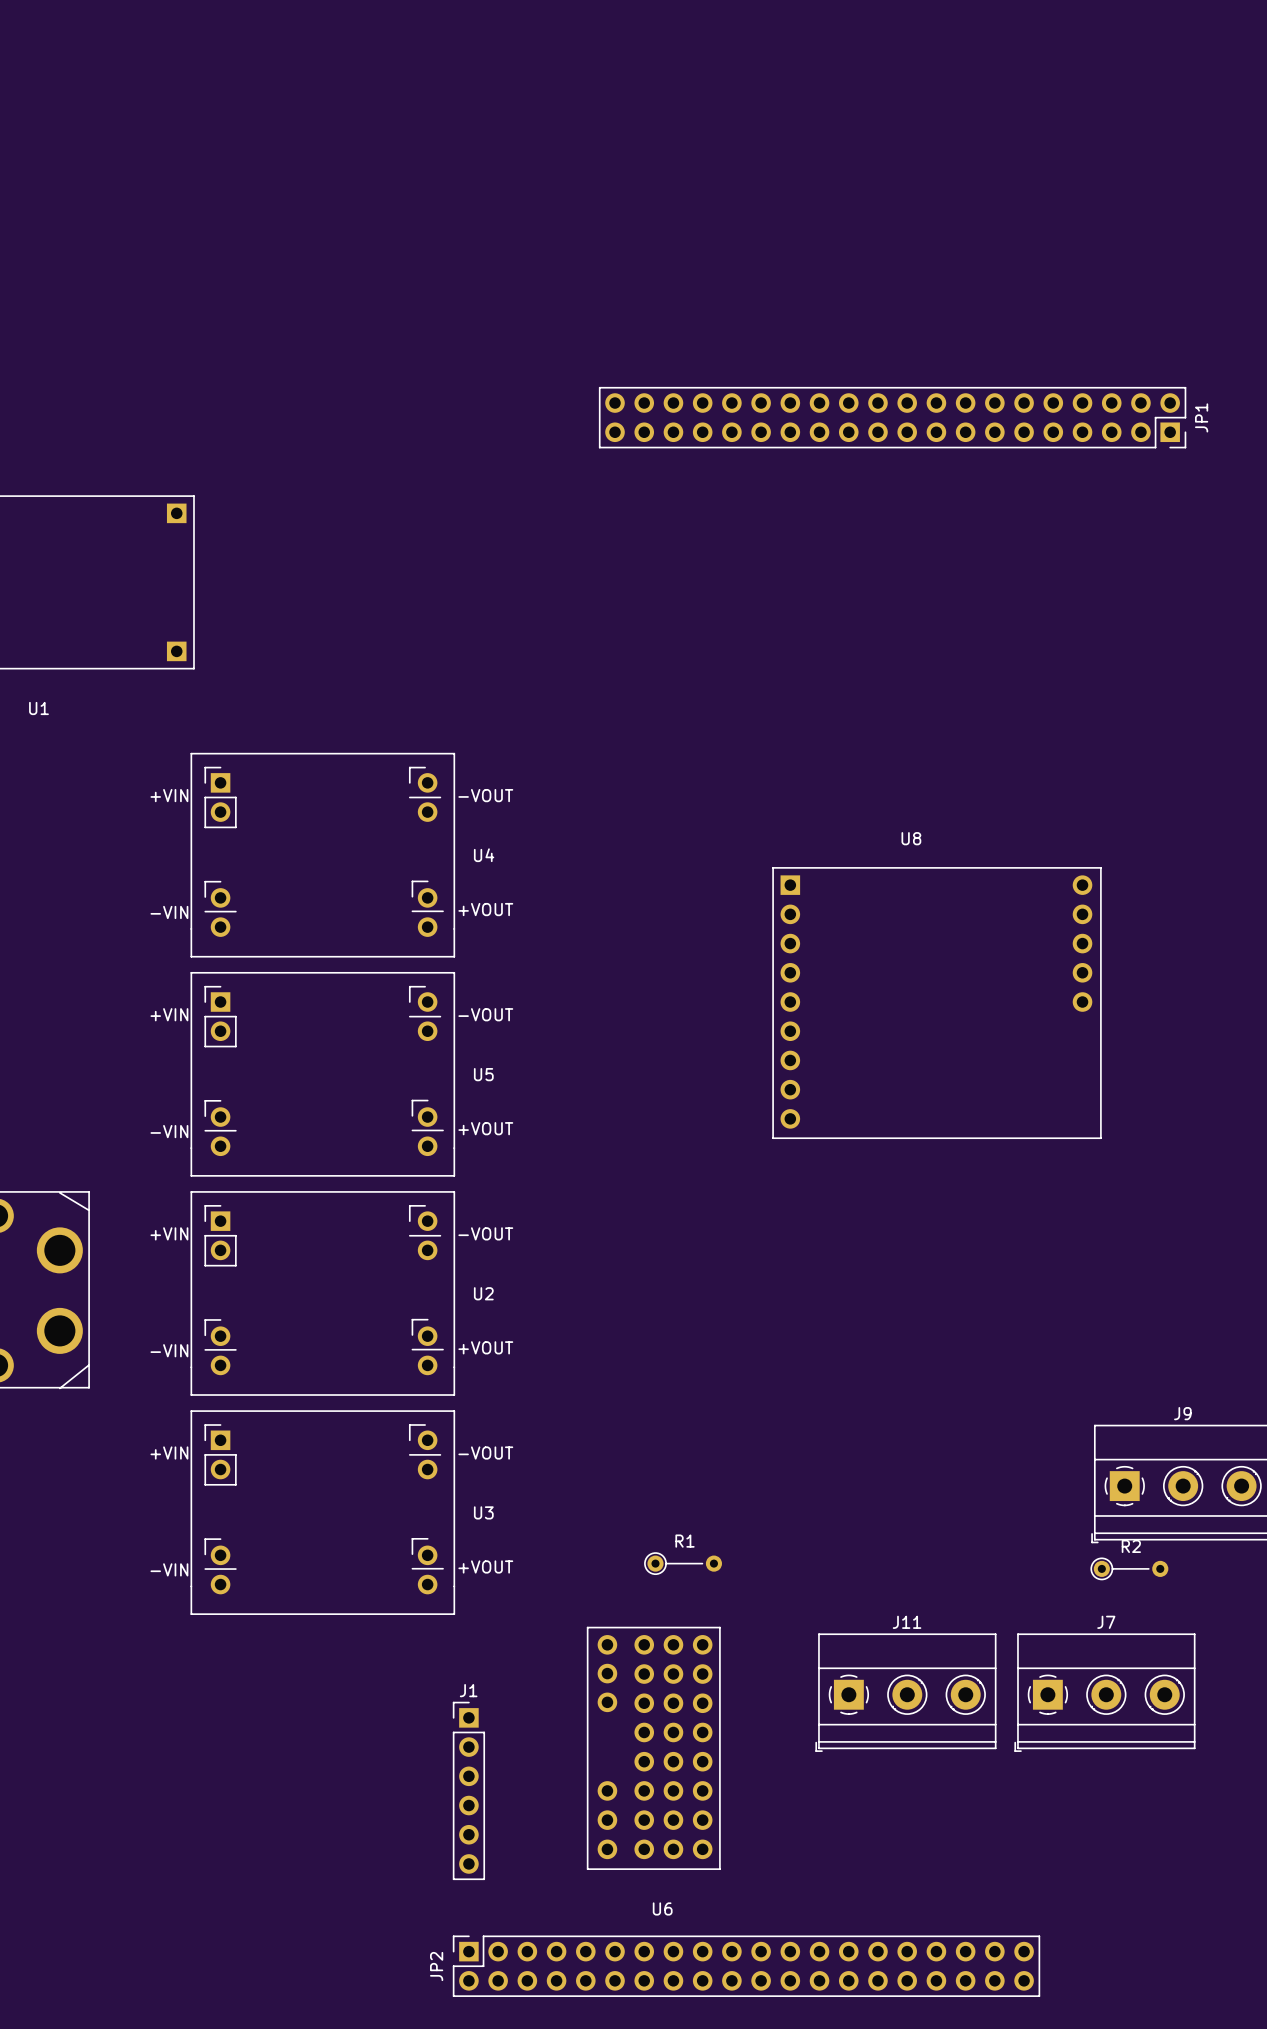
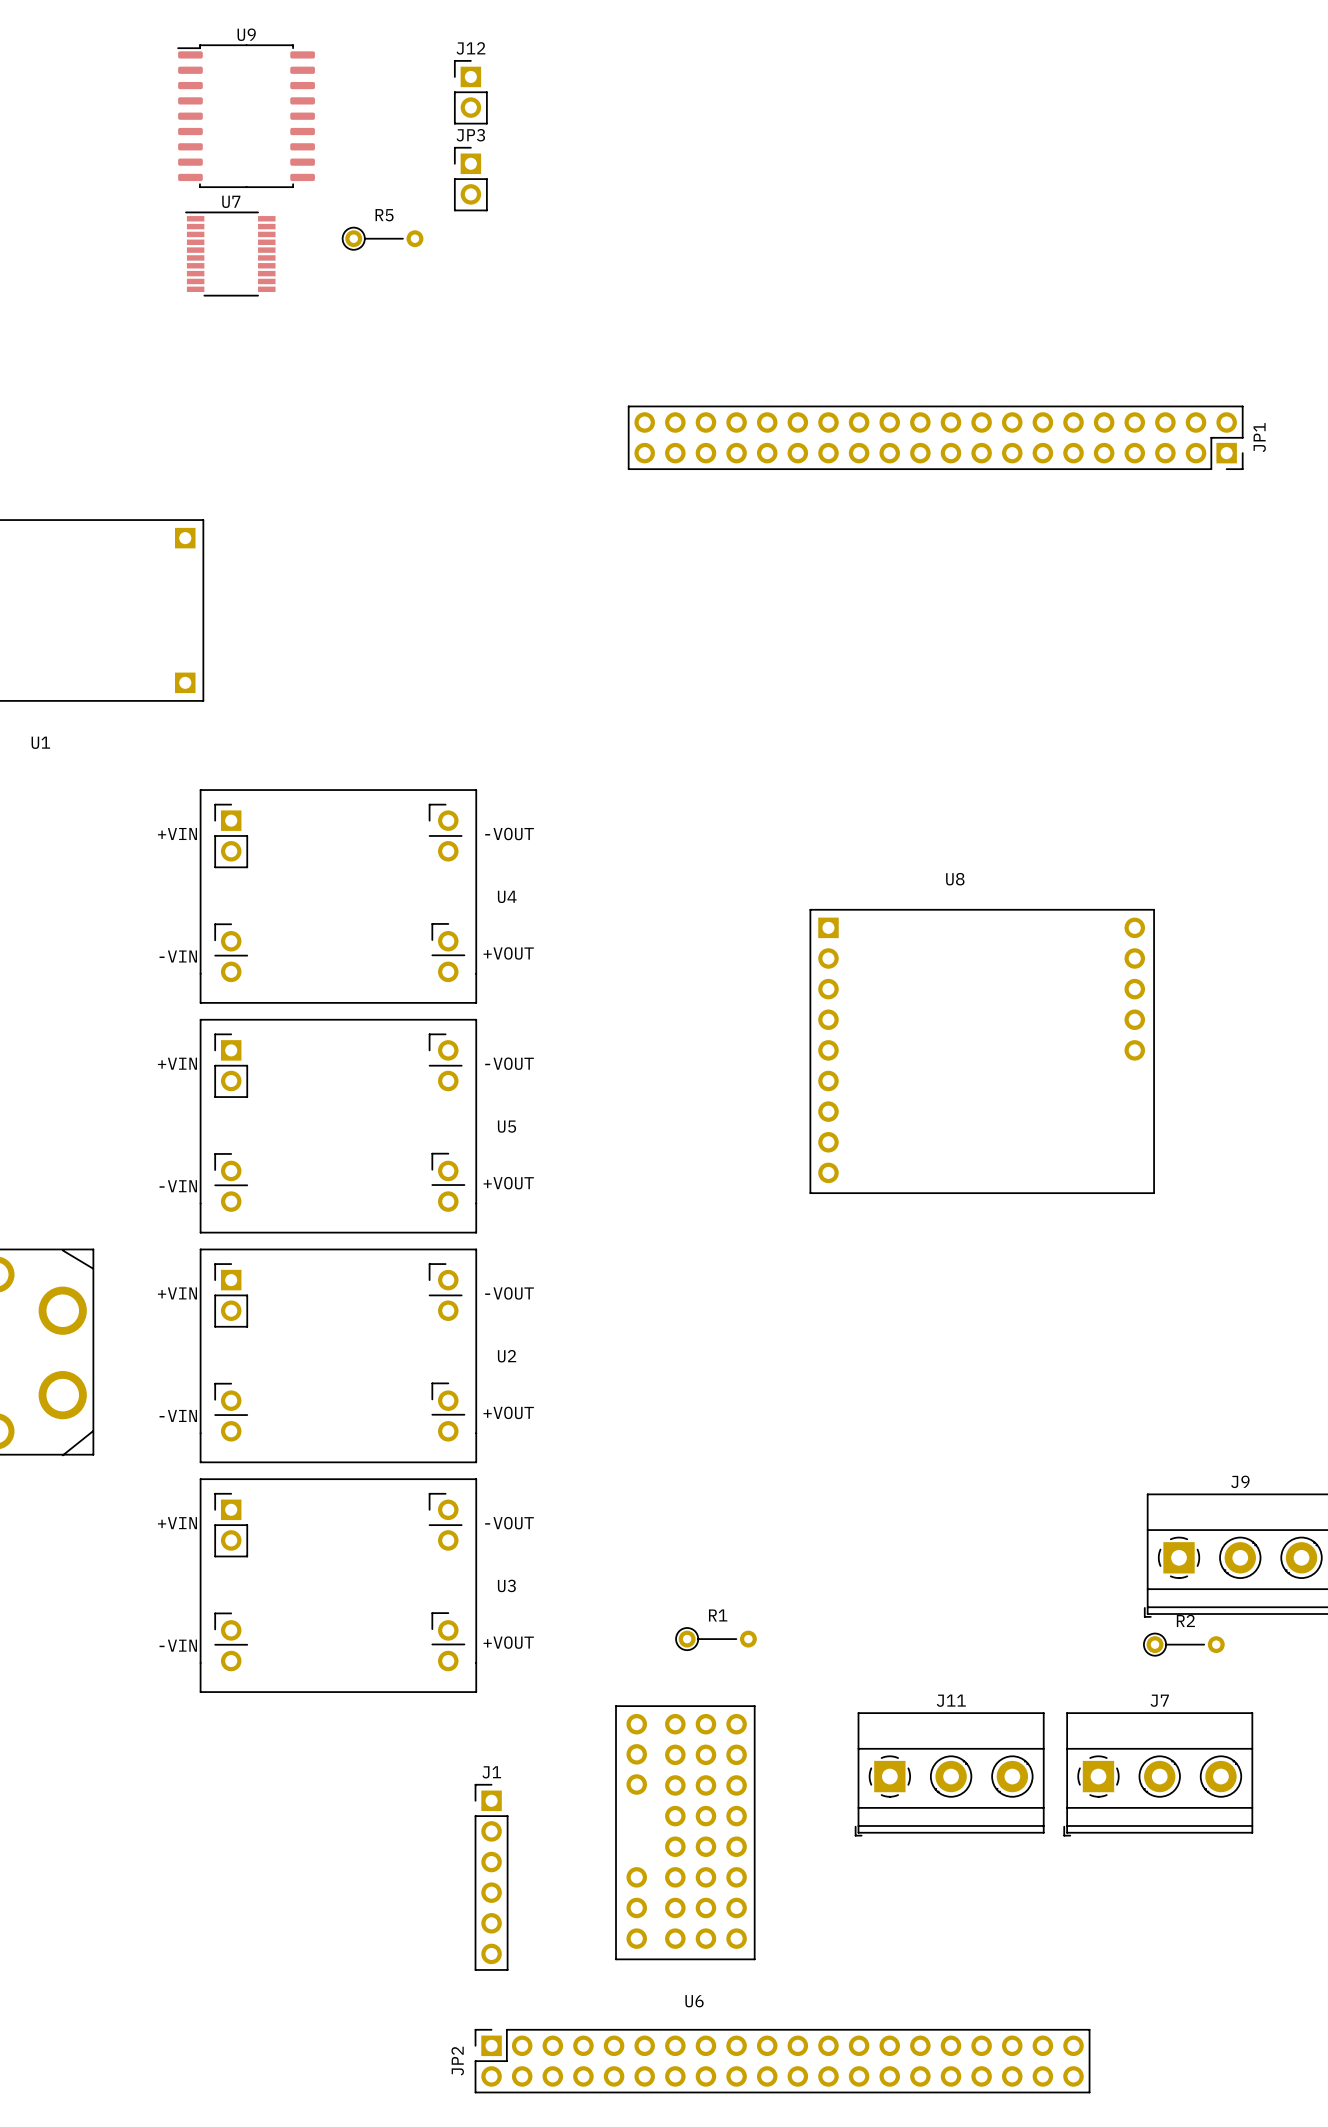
J12: none -> (470, 92)
U9: none -> (246, 116)
JP3: none -> (470, 179)
R5: none -> (382, 238)
U7: none -> (230, 254)

